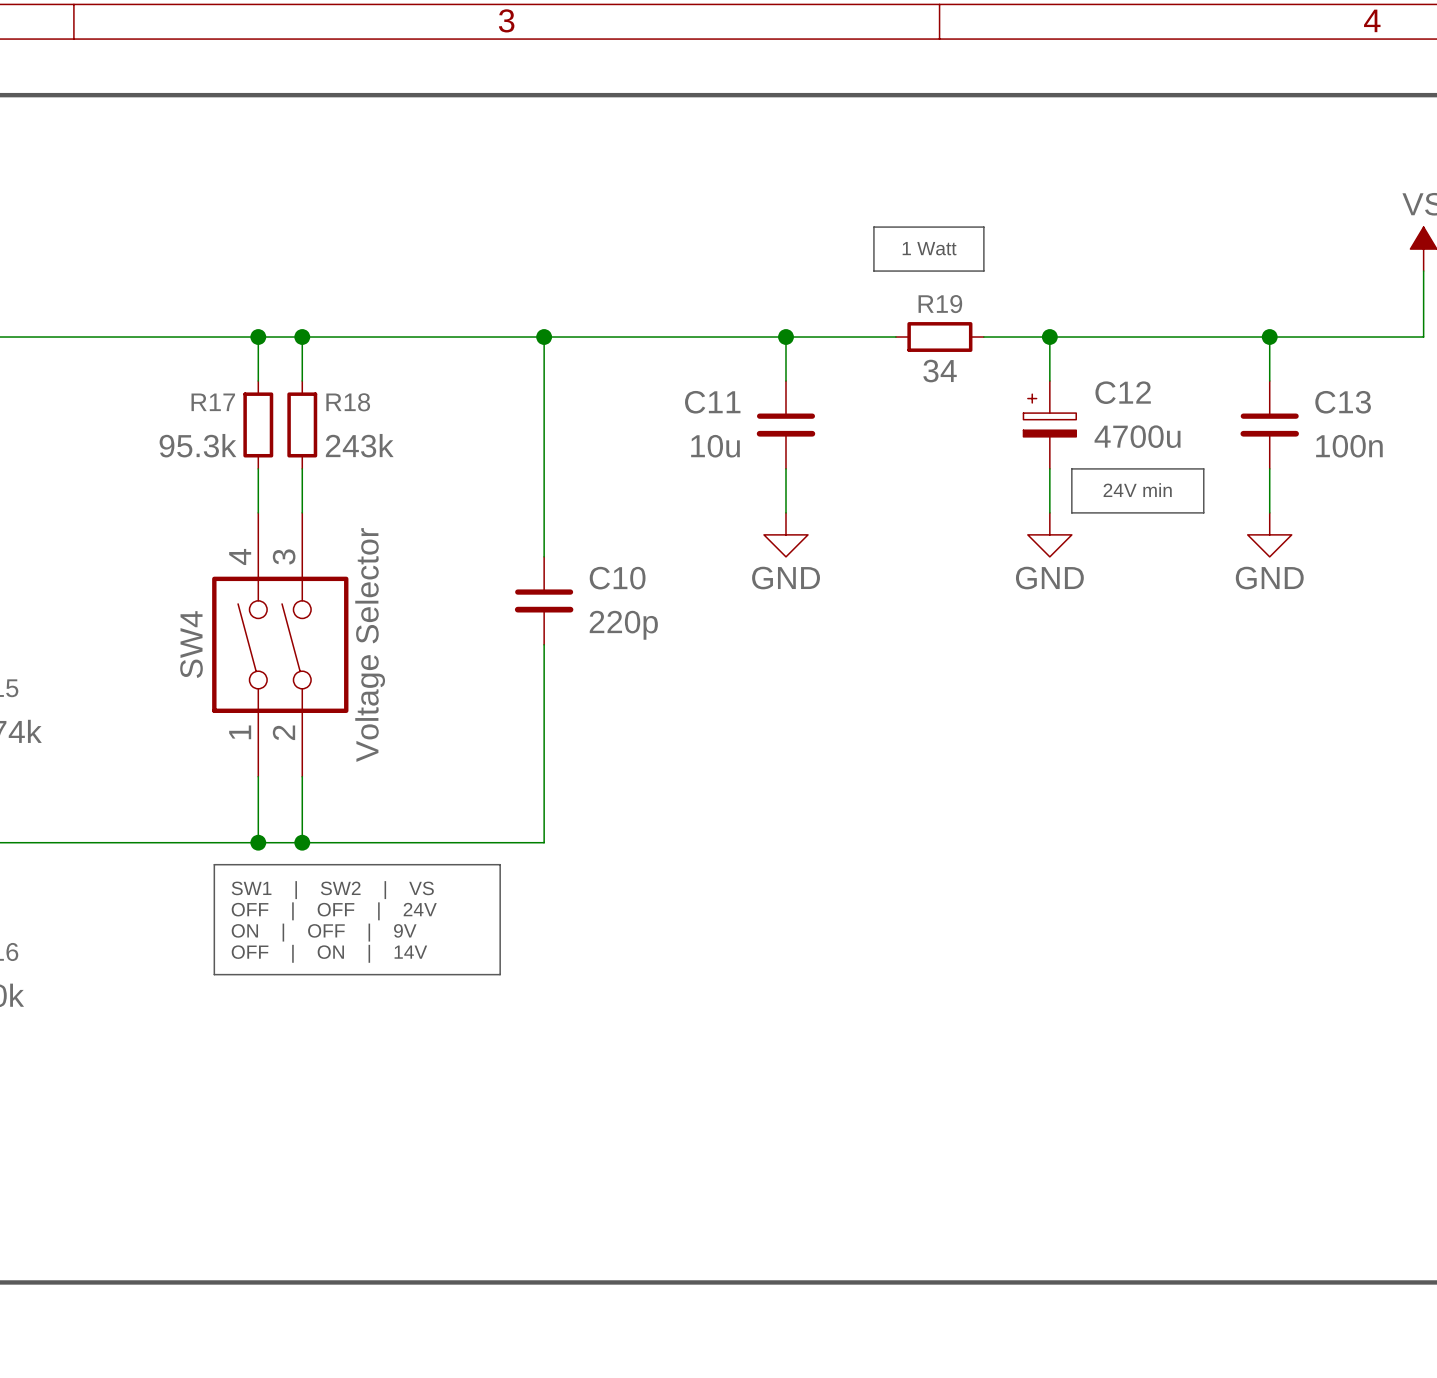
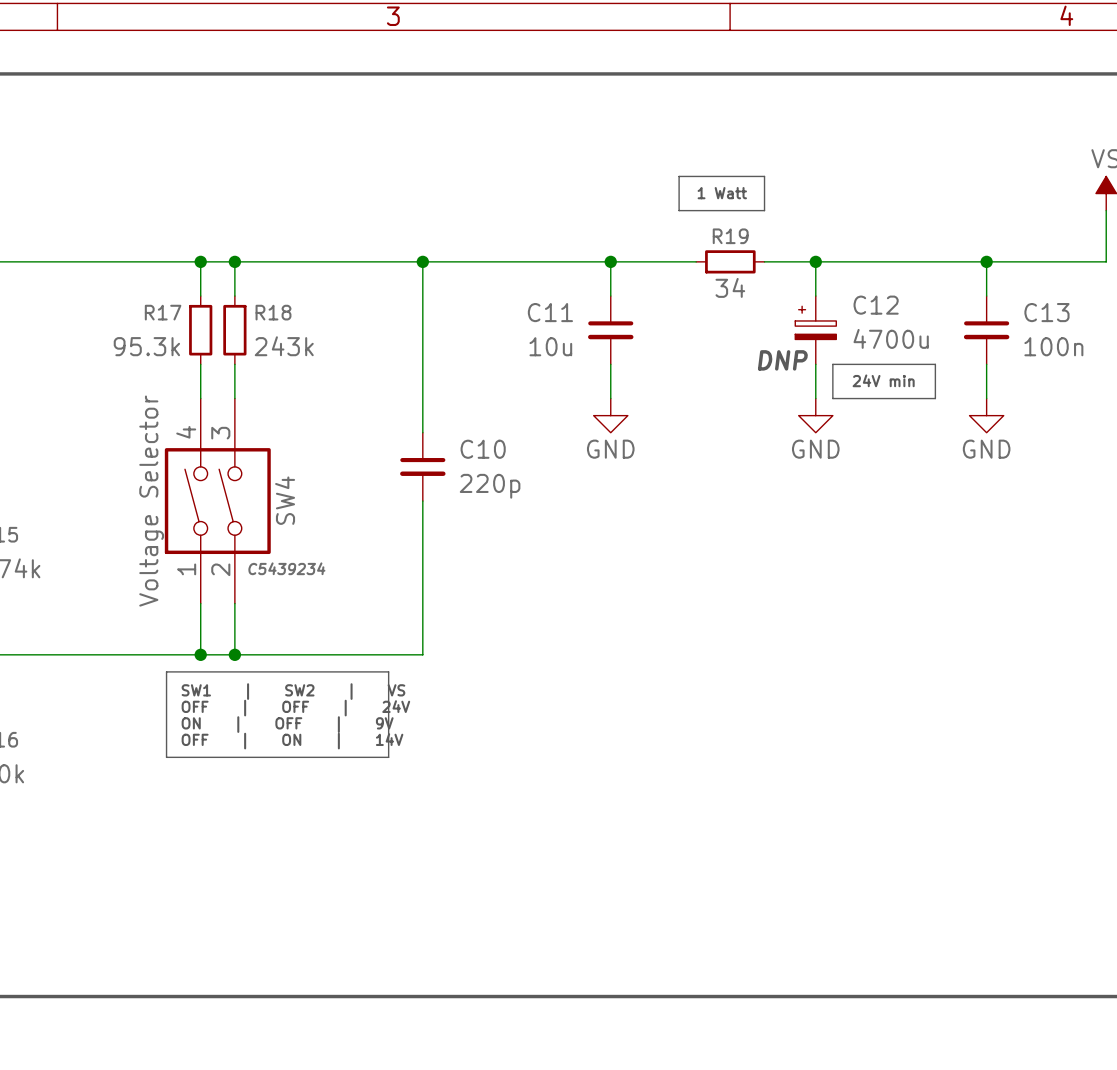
text: none -> DNP (782, 360)
SW4 name position: SW4 (191, 644) -> SW4 (285, 500)
SW4 value position: Voltage Selector (370, 645) -> Voltage Selector (151, 501)
SW4 text: none -> C5439234 (286, 568)

